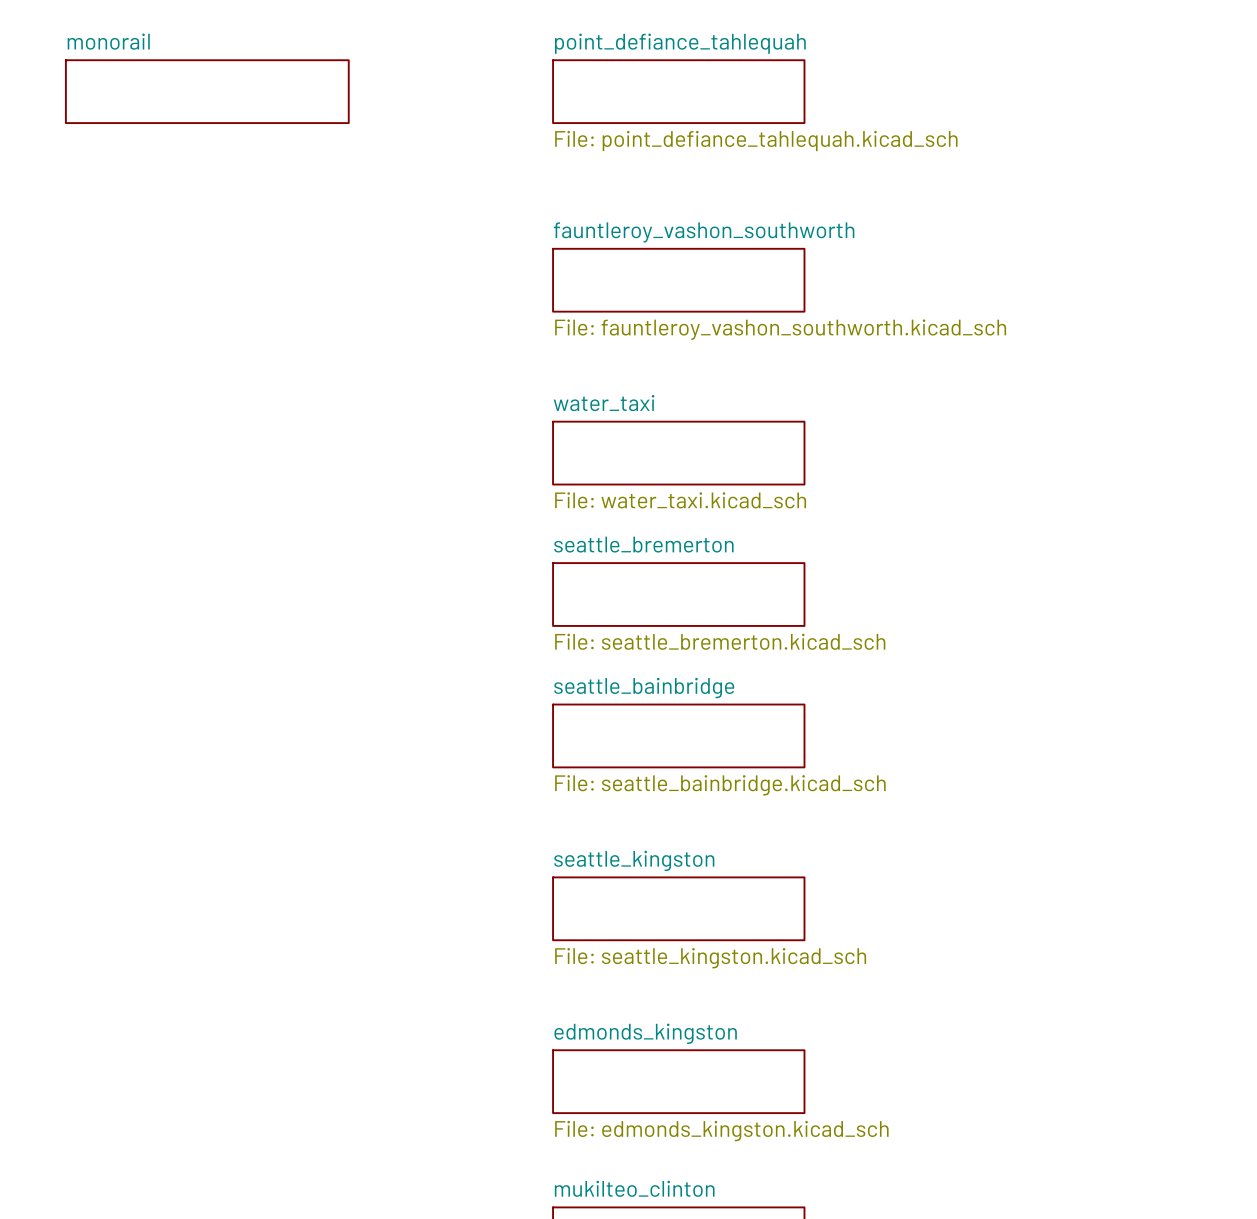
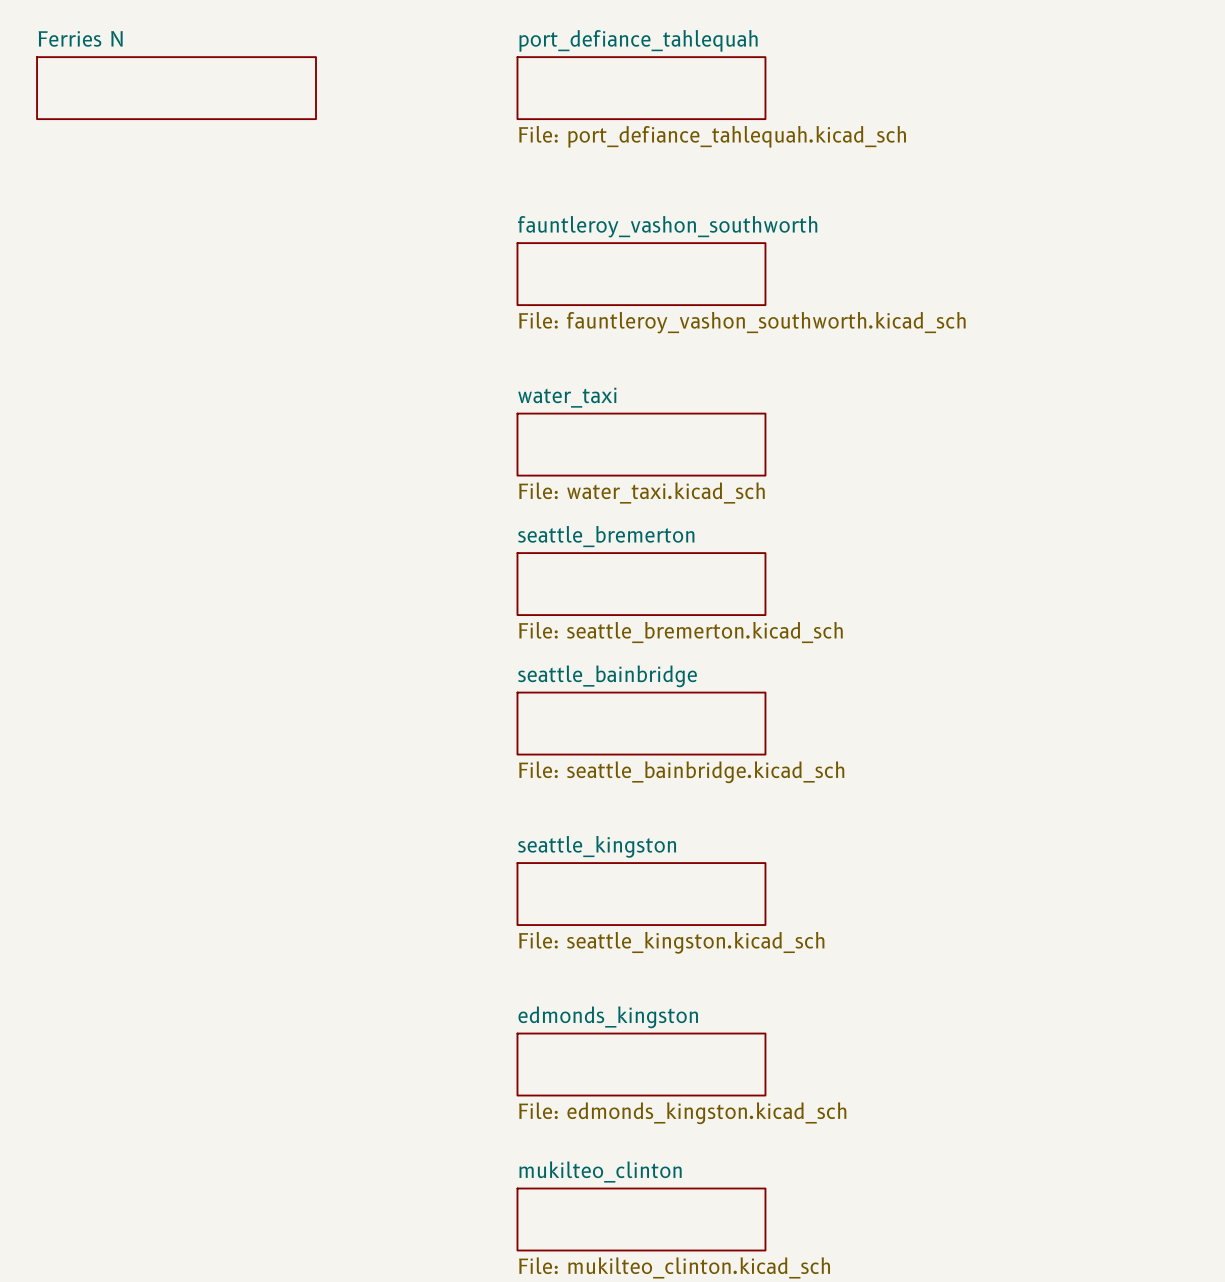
sheet monorail name: monorail (108, 41) -> Ferries N (80, 38)
sheet point_defiance_tahlequah name: point_defiance_tahlequah (680, 43) -> port_defiance_tahlequah (638, 40)
sheet point_defiance_tahlequah value: File: point_defiance_tahlequah.kicad_sch (756, 140) -> File: port_defiance_tahlequah.kicad_sch (712, 136)

